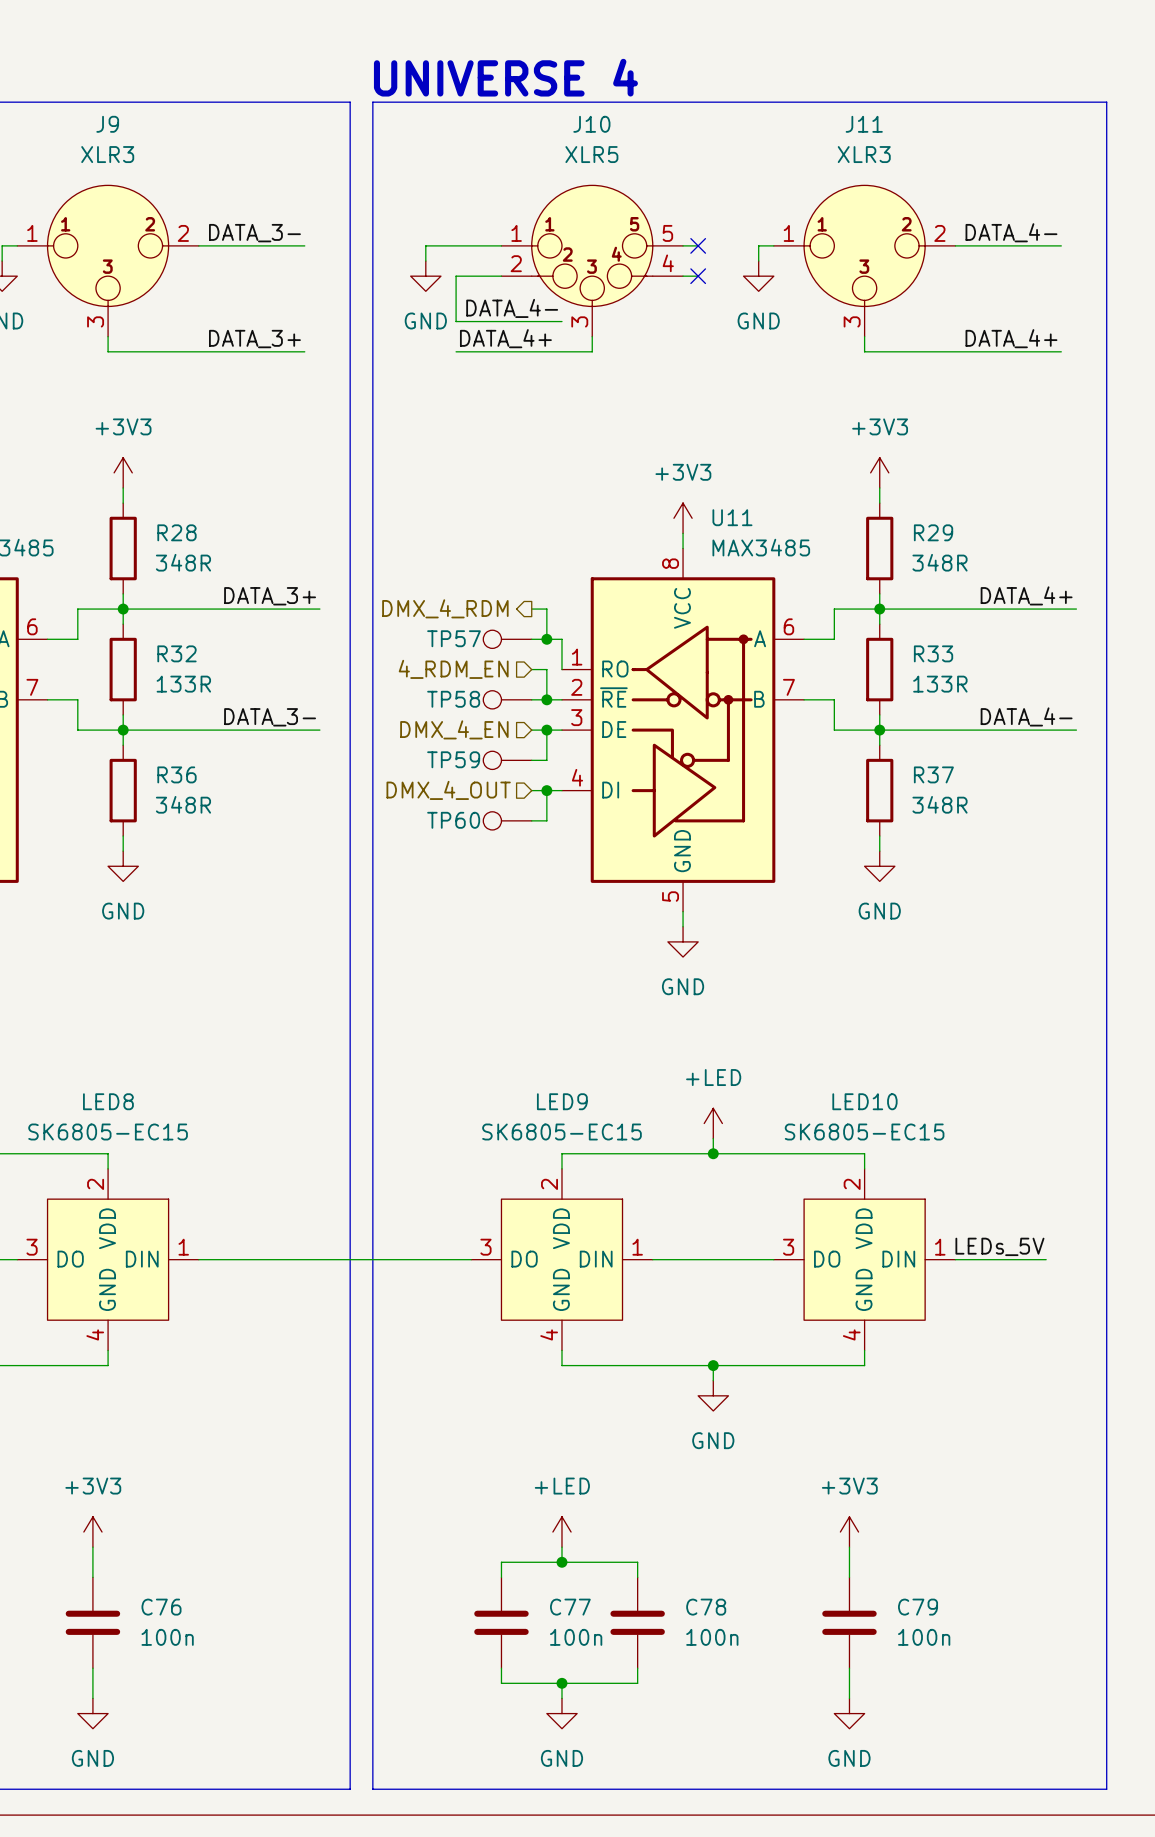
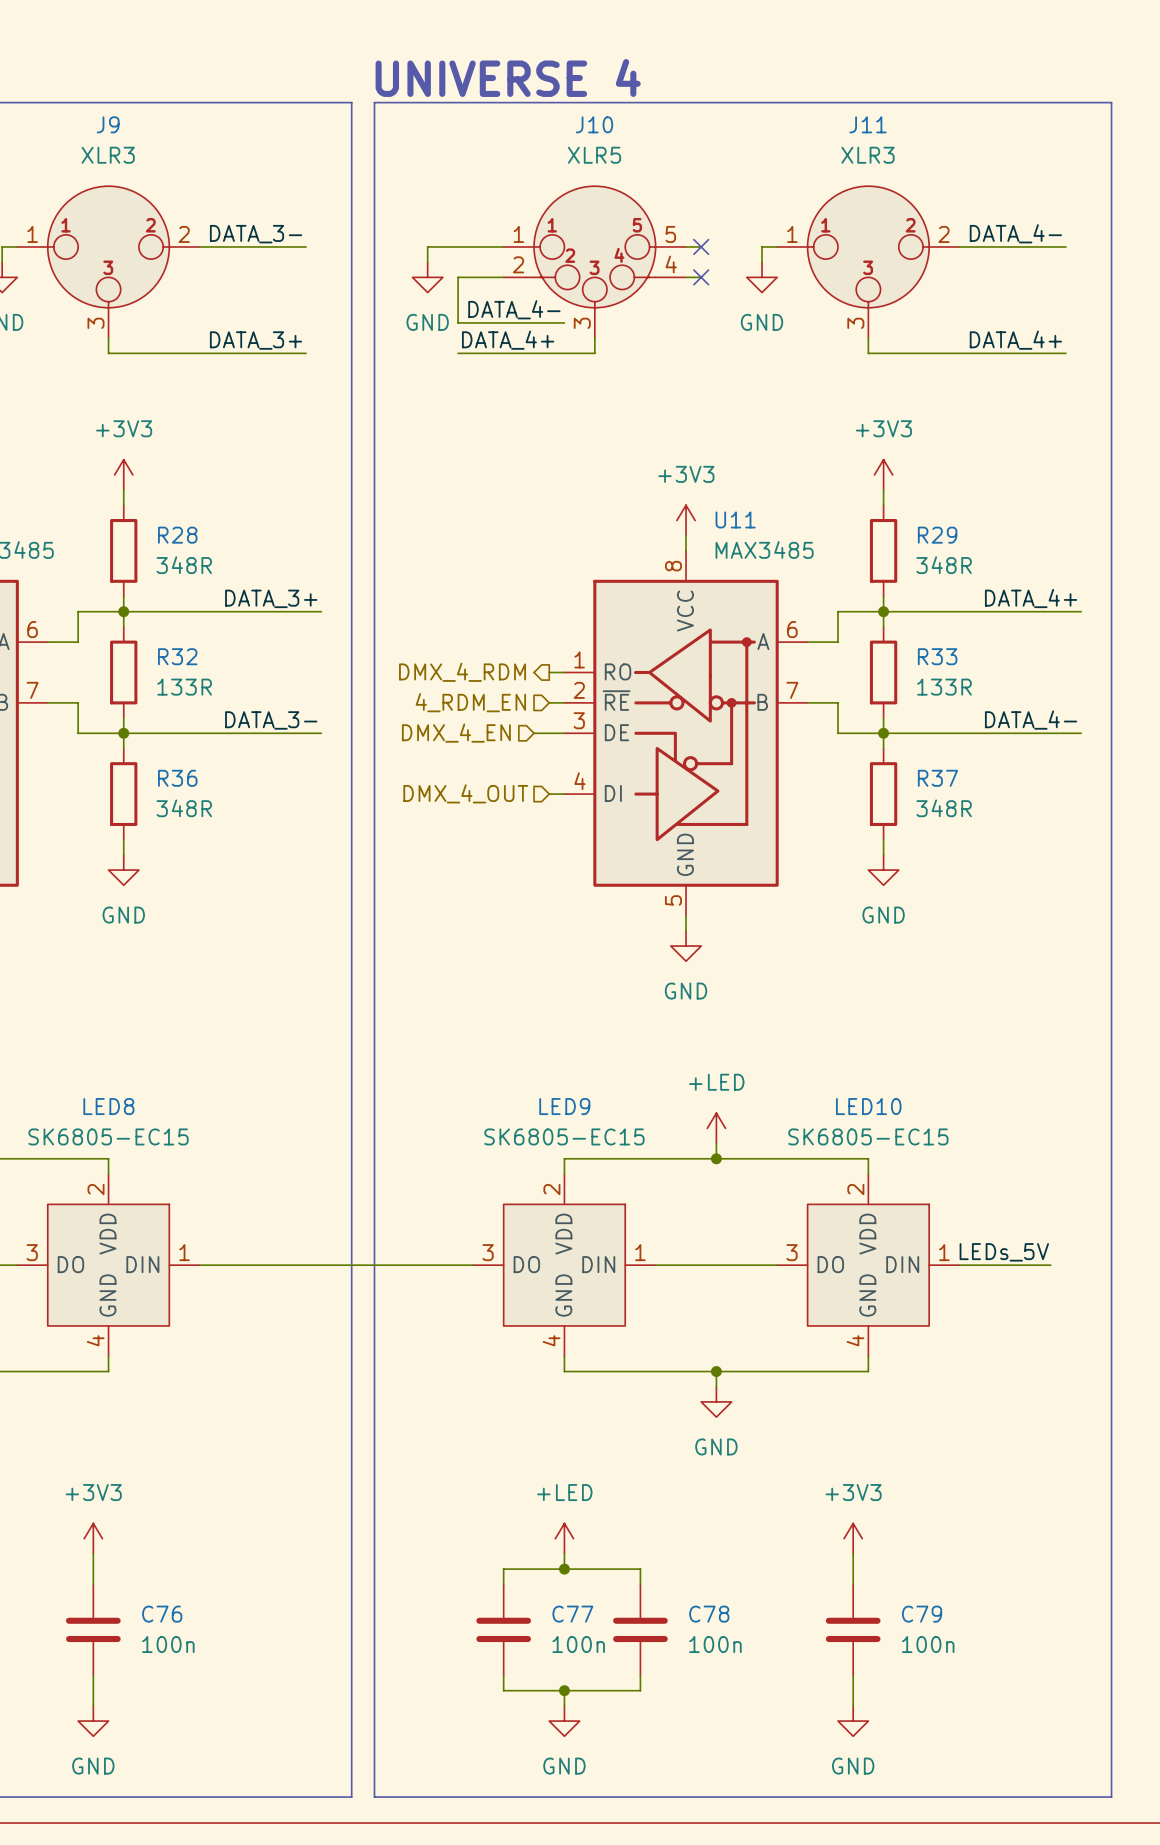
hierarchical label position: DMX_4_RDM (445, 608) -> DMX_4_RDM (462, 672)
wire: (531, 609) (546, 609) (546, 639) -> none
TP57: (507, 639) -> none
wire: (531, 639) (561, 639) (561, 669) -> (549, 672) (564, 672)
junction: (546, 639) -> none
hierarchical label position: 4_RDM_EN (453, 669) -> 4_RDM_EN (470, 702)
wire: (531, 669) (546, 669) (546, 699) (531, 699) -> none
TP58: (507, 699) -> none
junction: (546, 699) -> none
wire: (546, 730) (546, 760) (531, 760) -> none
junction: (546, 730) -> none
TP59: (507, 760) -> none
hierarchical label position: DMX_4_OUT (448, 790) -> DMX_4_OUT (465, 793)
wire: (531, 790) (546, 790) (546, 820) (531, 820) -> none
junction: (546, 790) -> none
TP60: (507, 820) -> none

